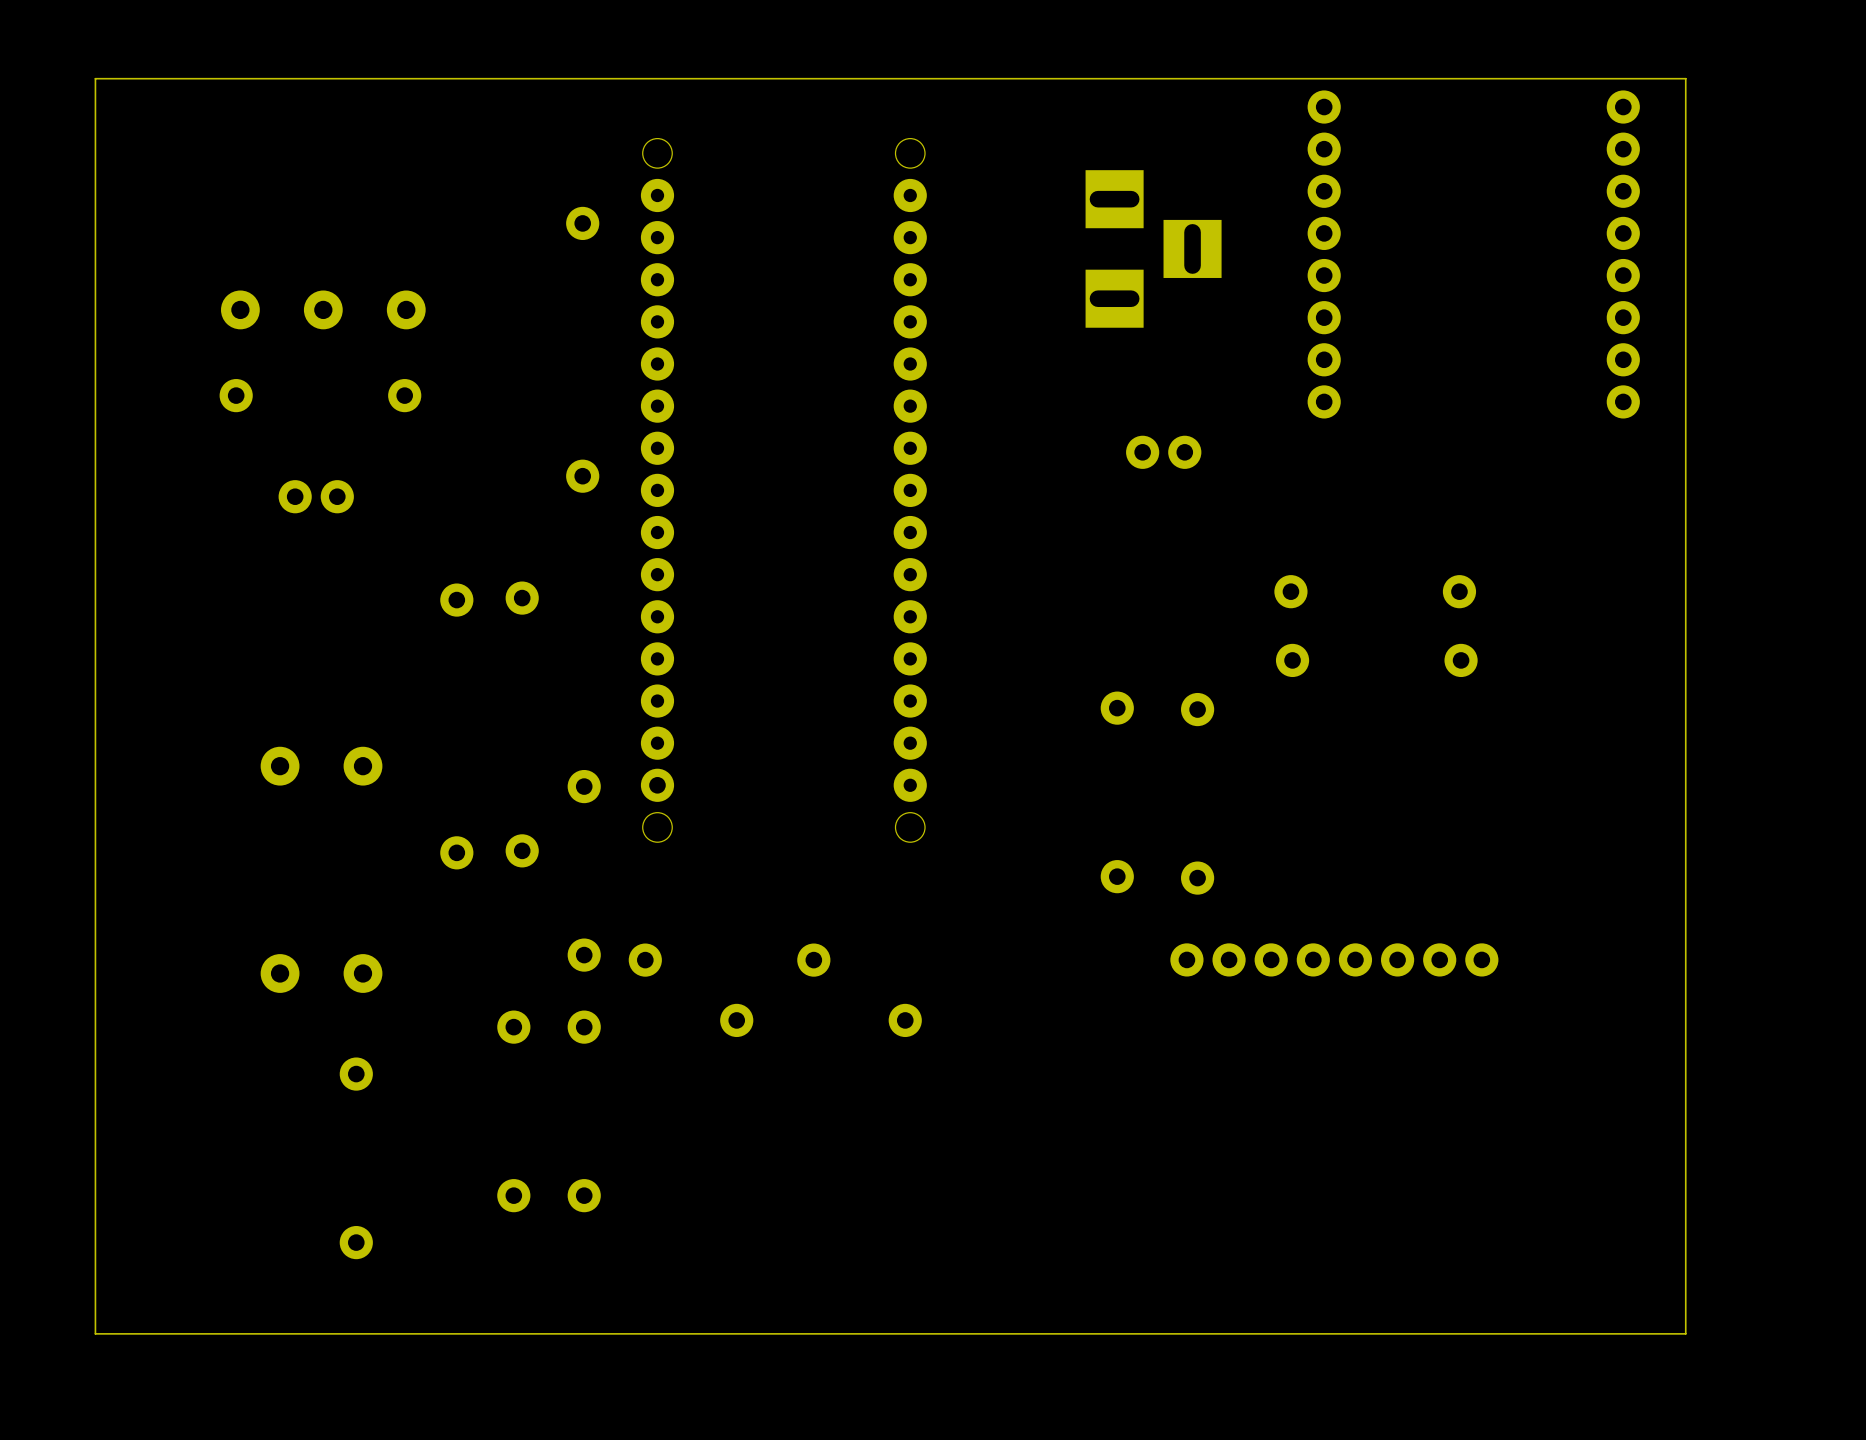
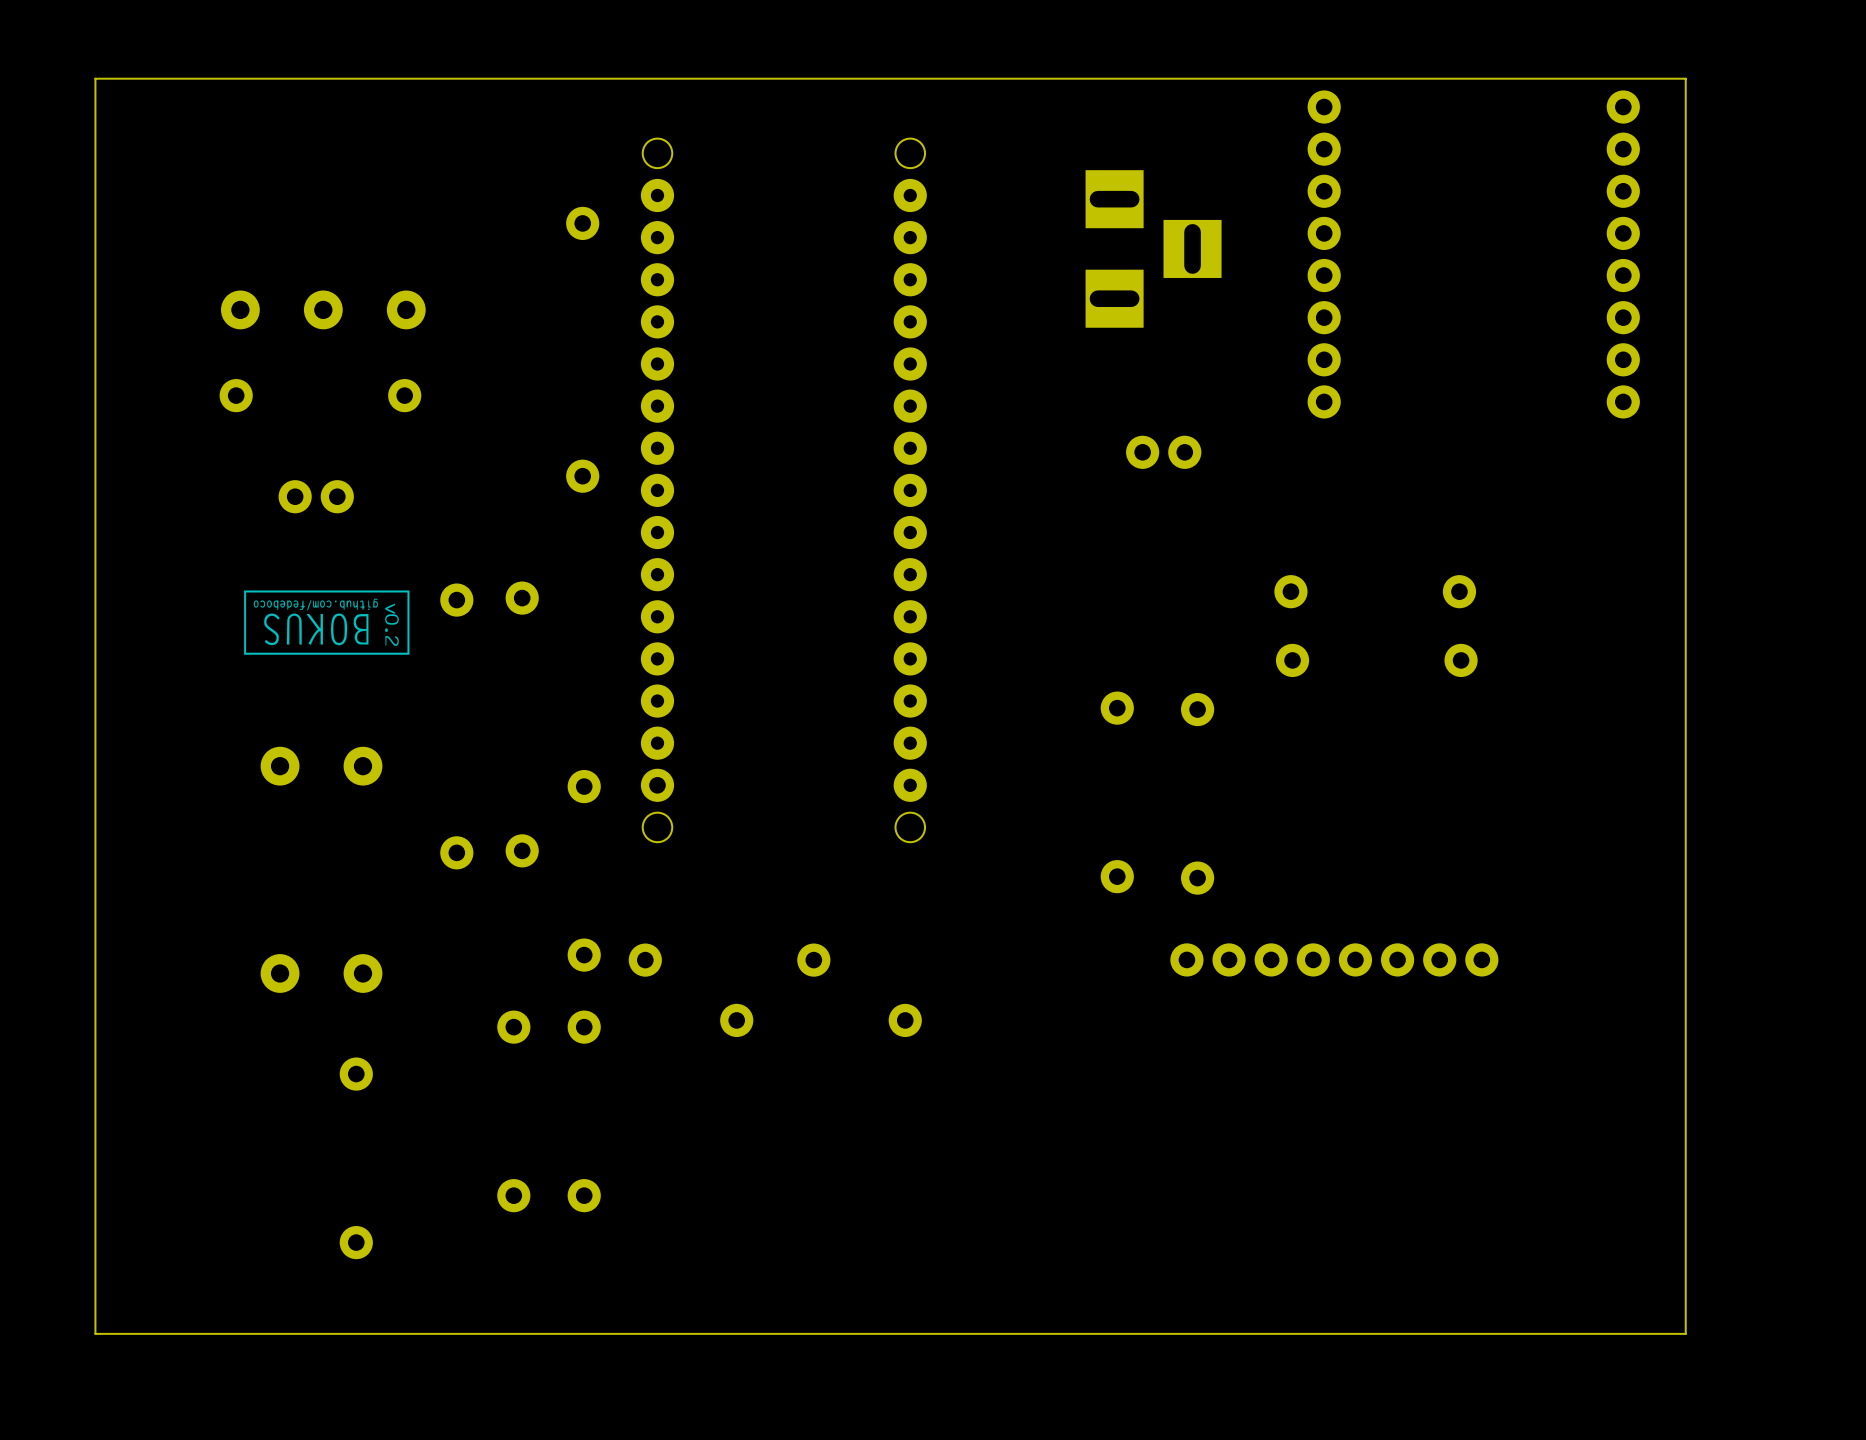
drawing: none -> [244, 590, 410, 655]

